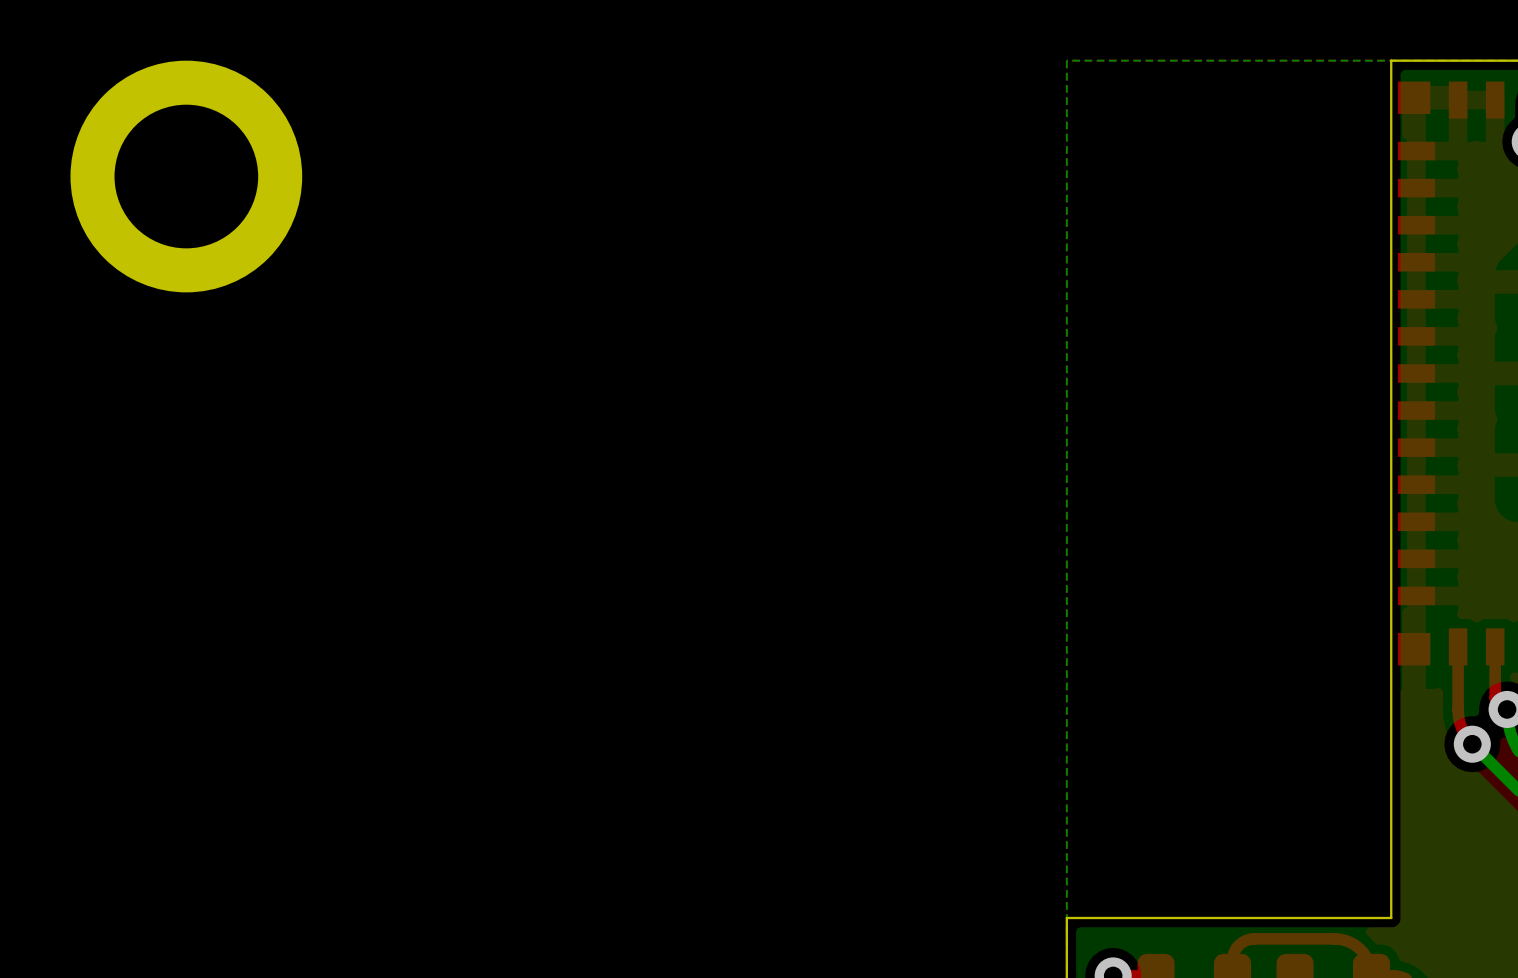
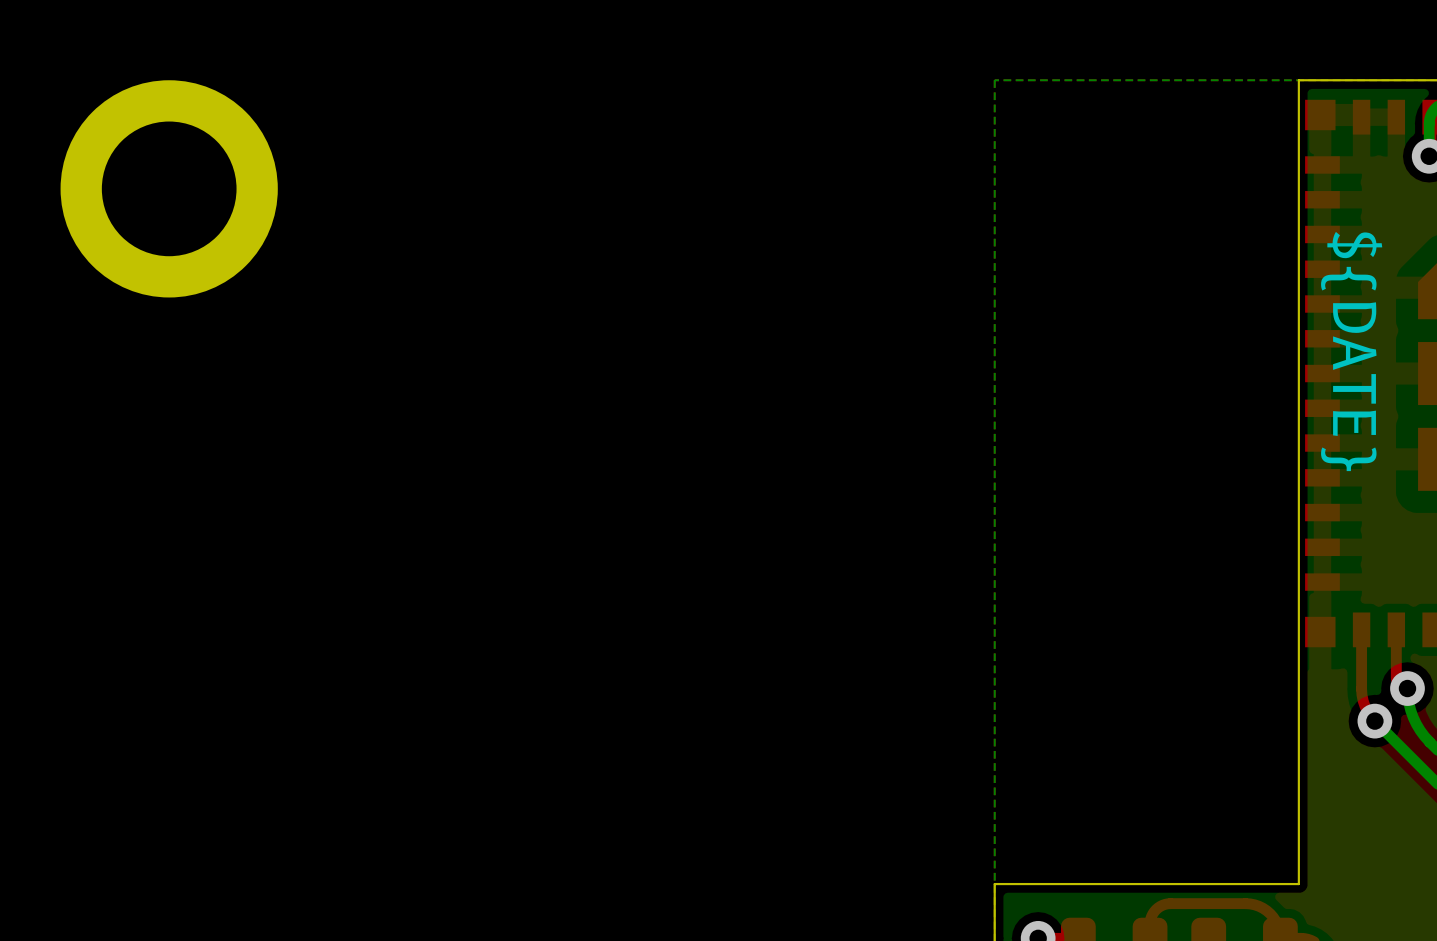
text: none -> ${DATE} (1351, 351)

